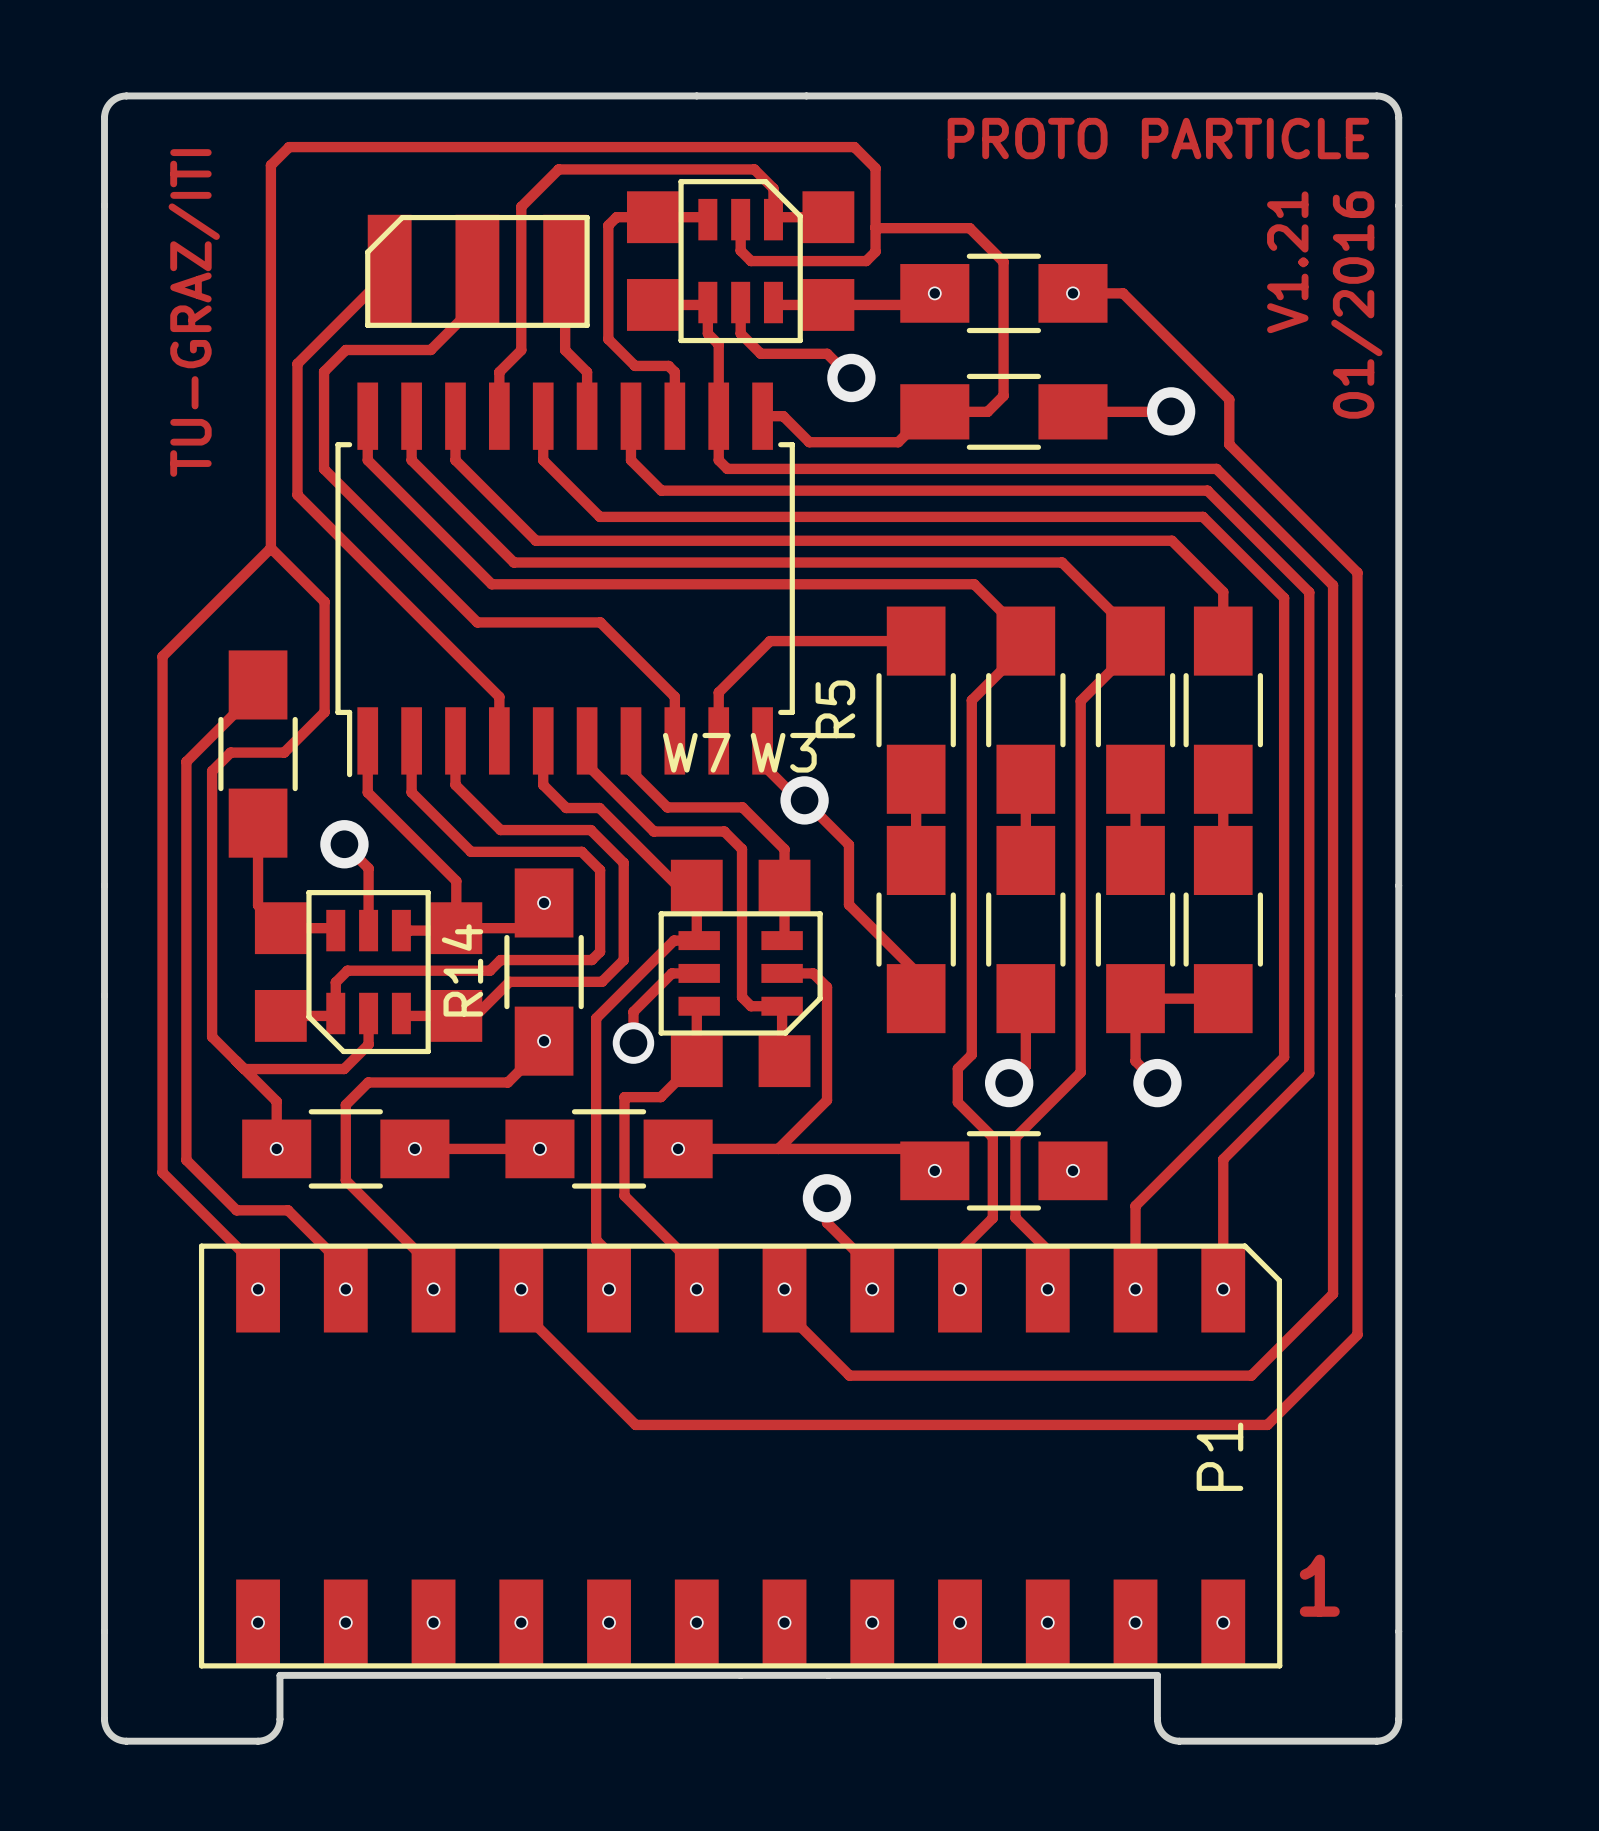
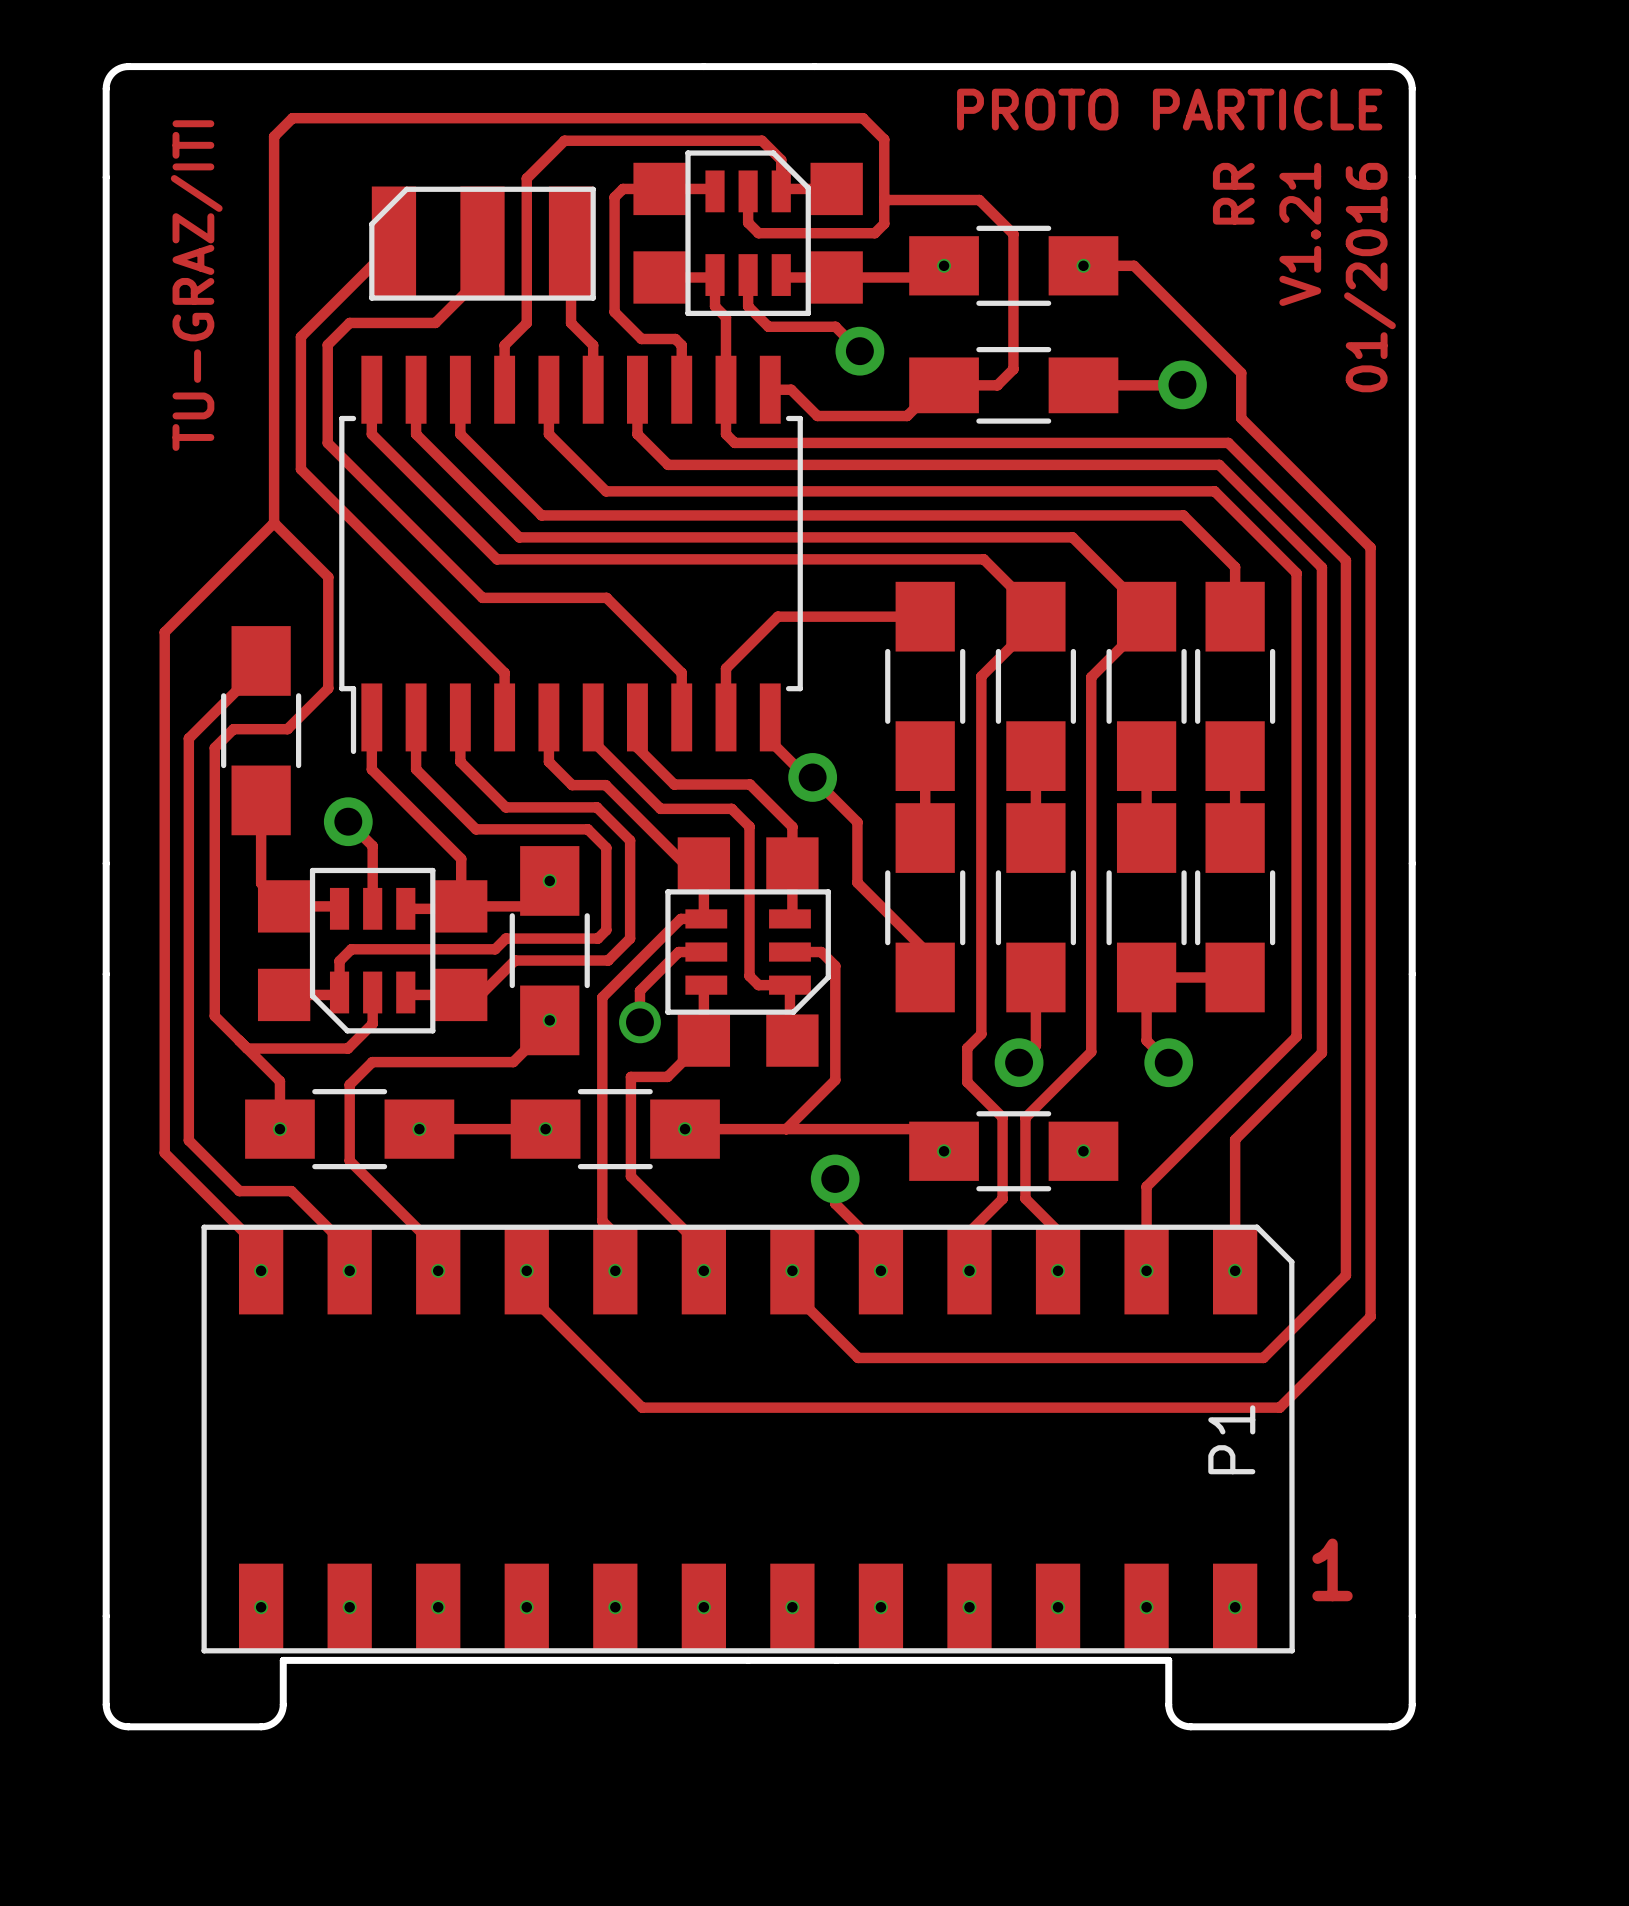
text: none -> RR (1233, 193)
R5 name: R5 (835, 709) -> none
W7 name: W7 (696, 752) -> none
W3 name: W3 (783, 752) -> none
R14 name: R14 (462, 970) -> none

